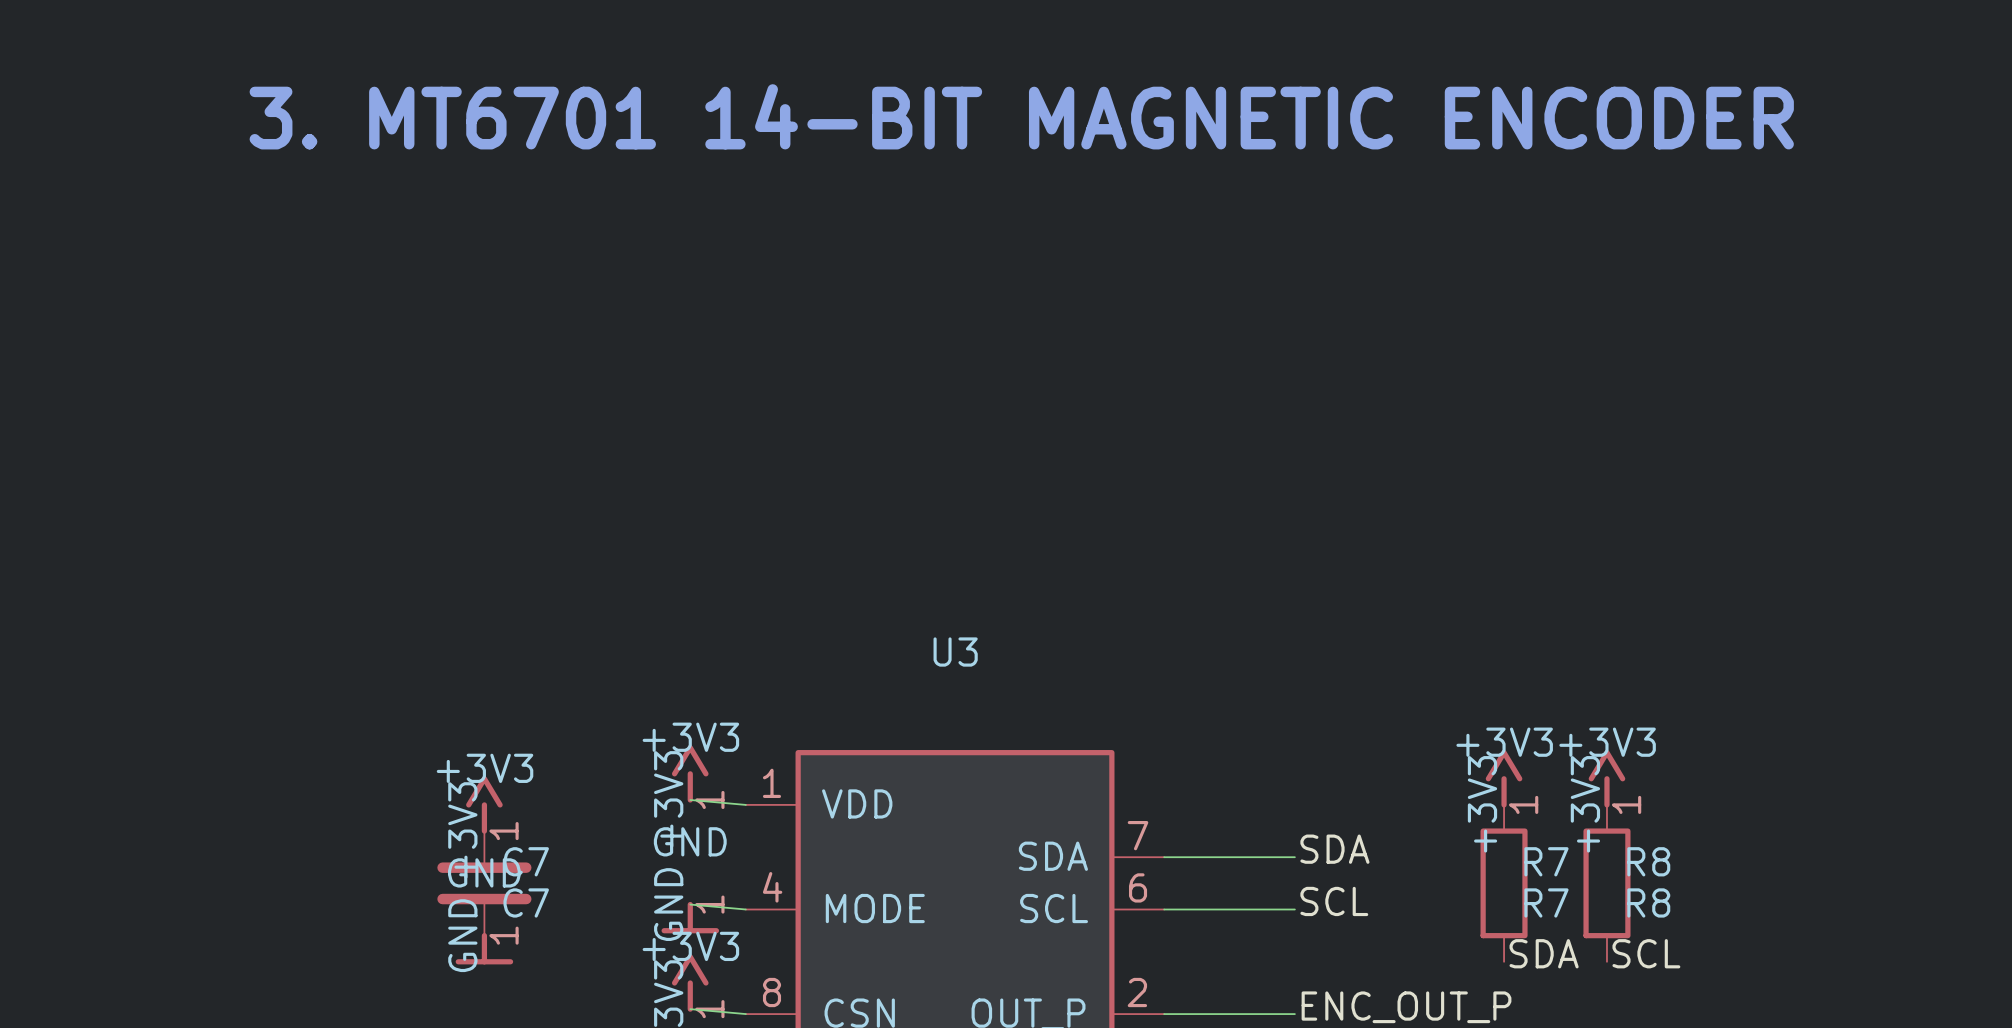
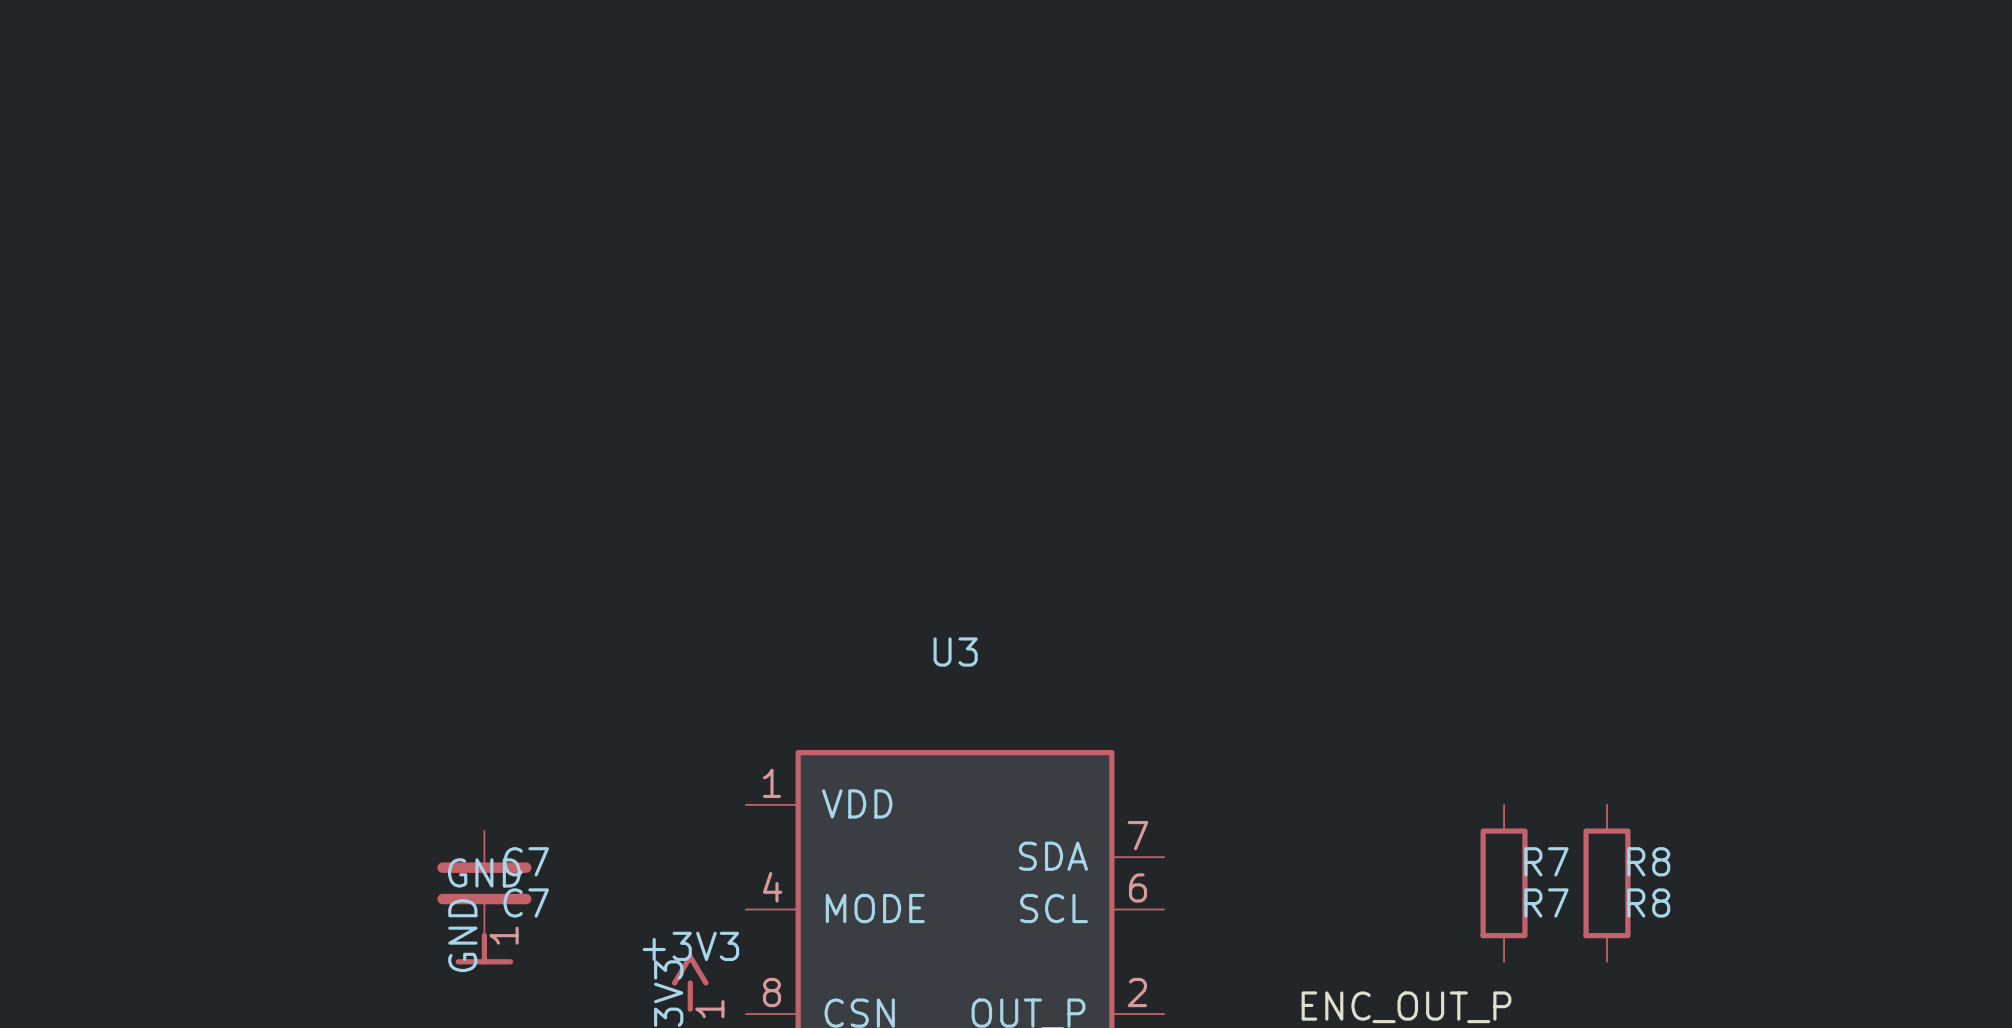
text: 3. MT6701 14-BIT MAGNETIC ENCODER (1021, 116) -> none
power symbol: +3V3 (690, 773) -> none
power symbol: +3V3 (1504, 778) -> none
power symbol: +3V3 (1606, 778) -> none
wire: (690, 799) (745, 804) -> none
power symbol: +3V3 (484, 804) -> none
label: SDA (1334, 849) -> none
wire: (1164, 857) (1294, 857) -> none
label: SCL (1334, 901) -> none
wire: (690, 904) (745, 909) -> none
wire: (1164, 909) (1294, 909) -> none
power symbol: GND (690, 917) -> none
label: SDA (1544, 953) -> none
label: SCL (1646, 953) -> none
wire: (690, 1009) (745, 1014) -> none
wire: (1164, 1014) (1294, 1014) -> none

